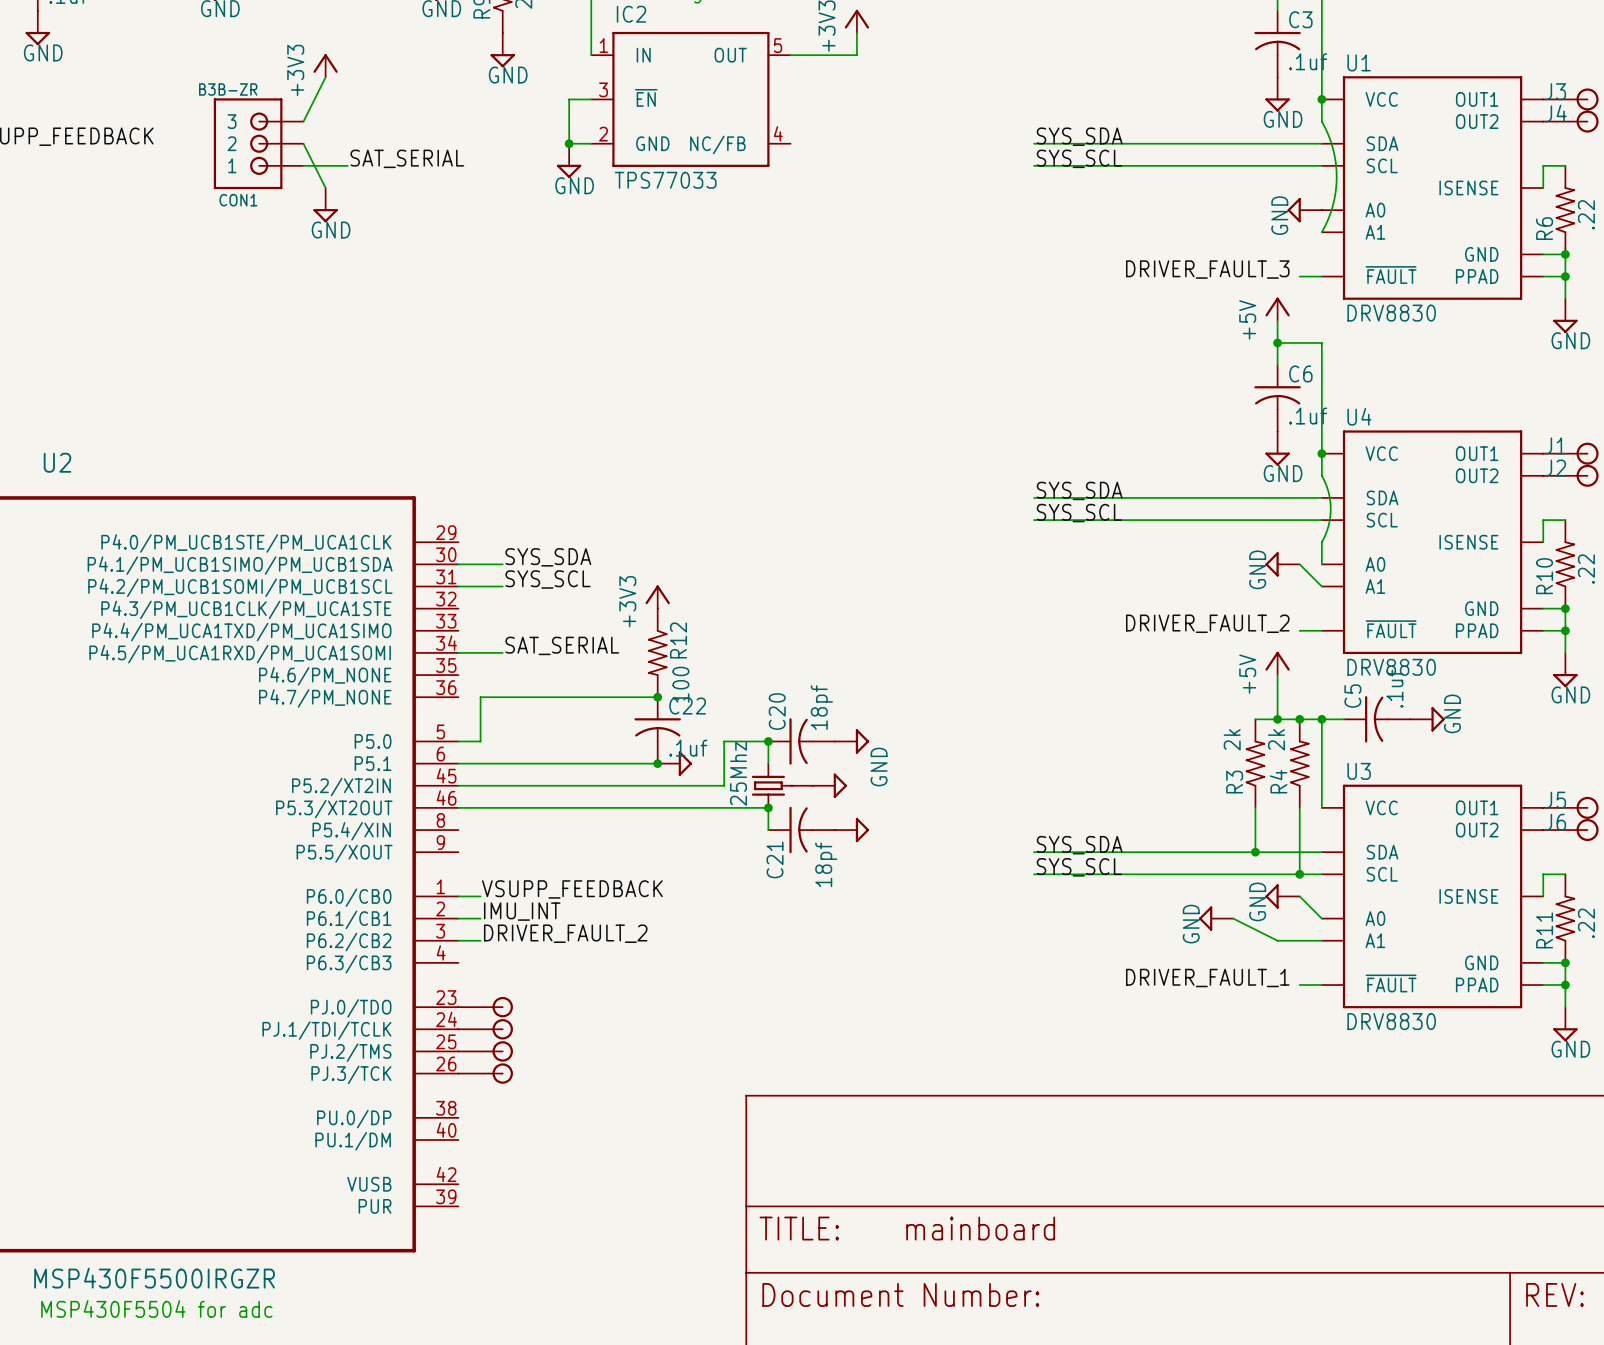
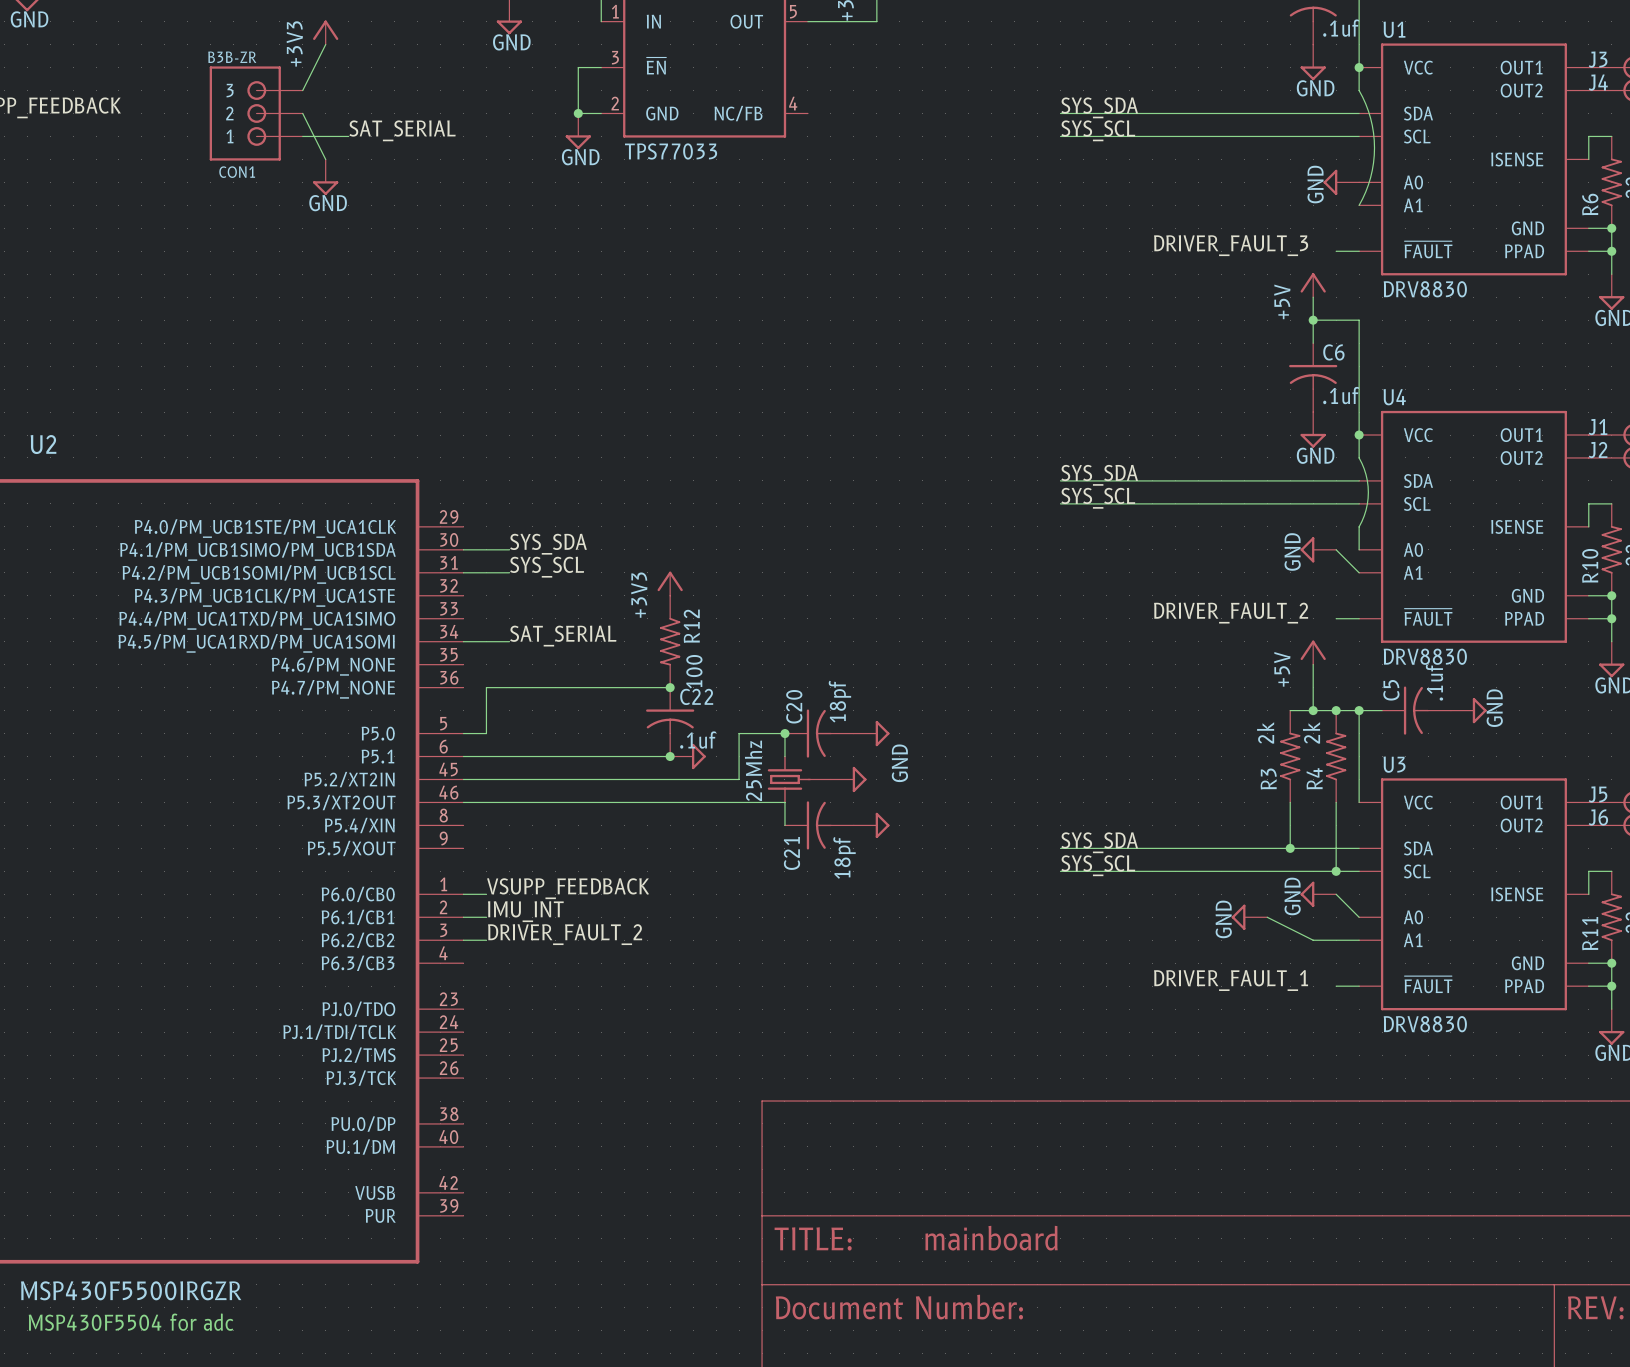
junction: (768, 807) -> none
part: (485, 1007) -> none
part: (485, 1029) -> none
part: (485, 1051) -> none
part: (485, 1073) -> none

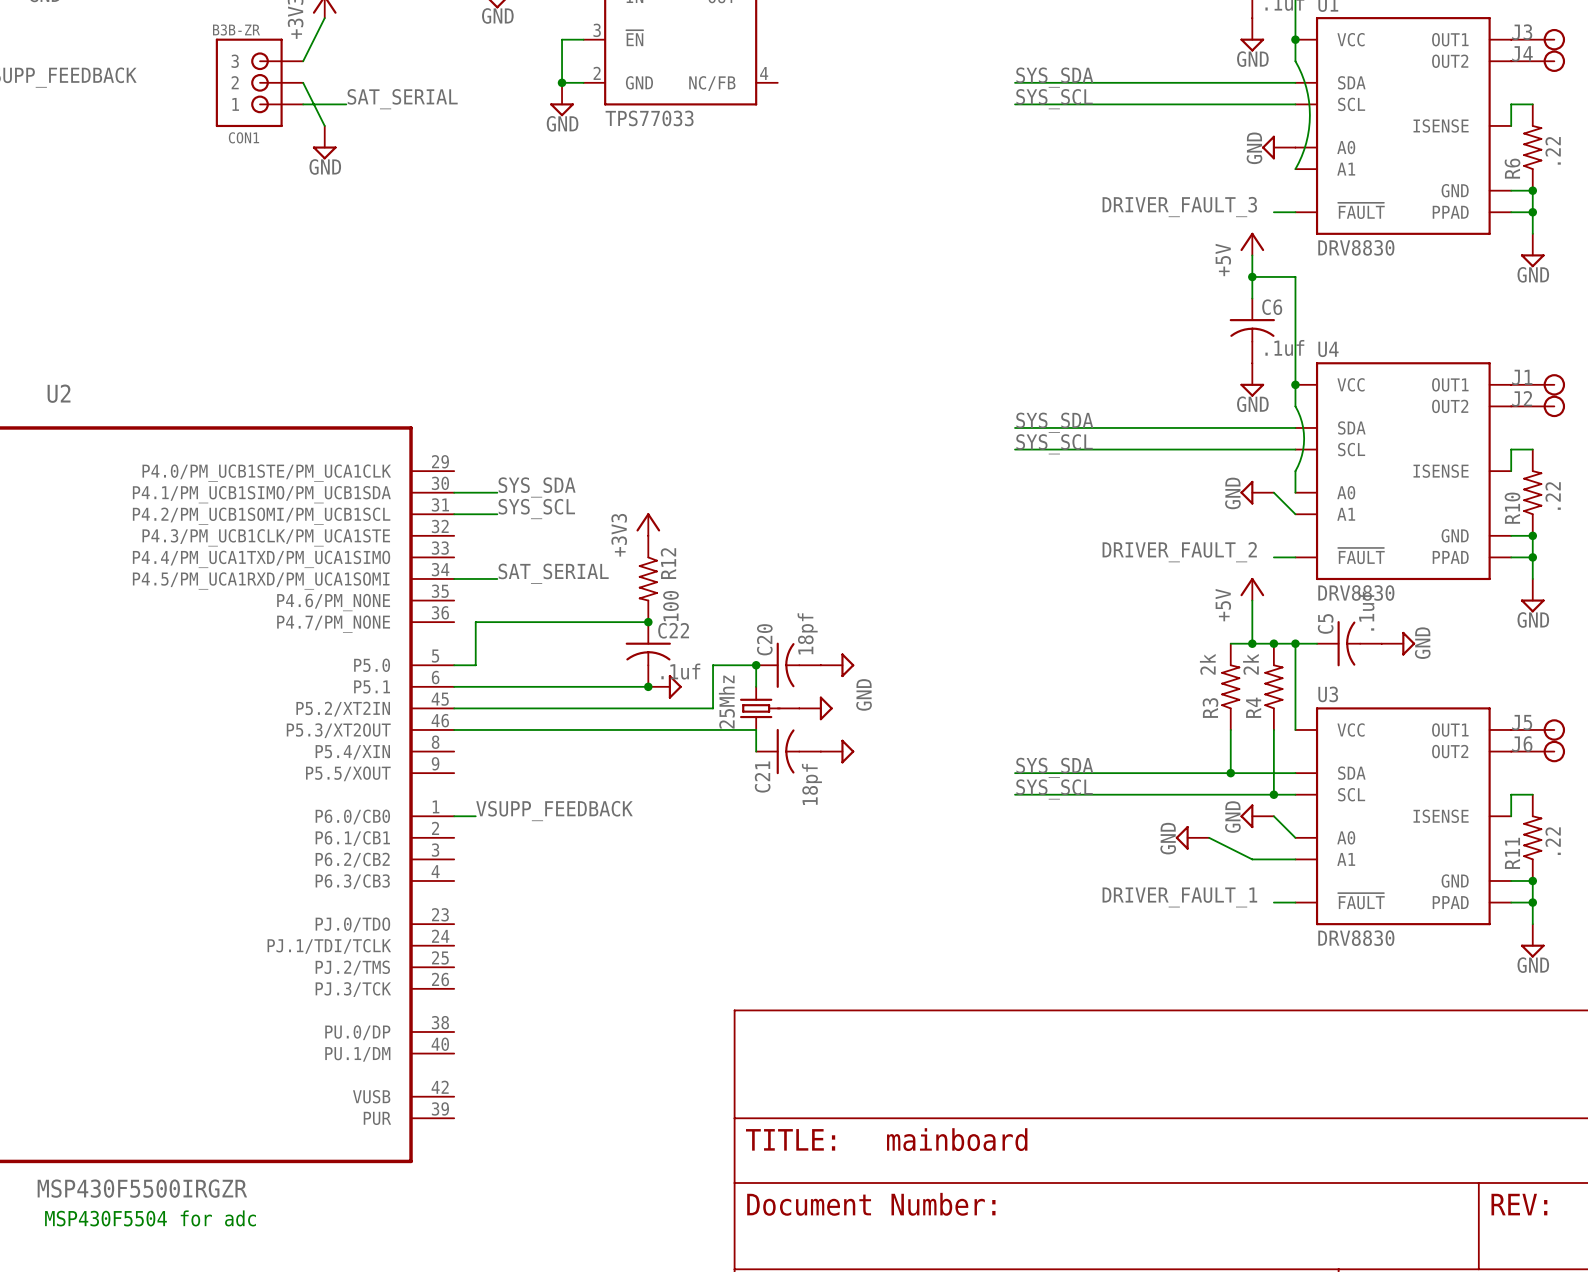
label: IMU_INT (525, 911) -> none
wire: (463, 917) (486, 917) -> none
label: DRIVER_FAULT_2 (565, 934) -> none
wire: (463, 940) (486, 940) -> none

